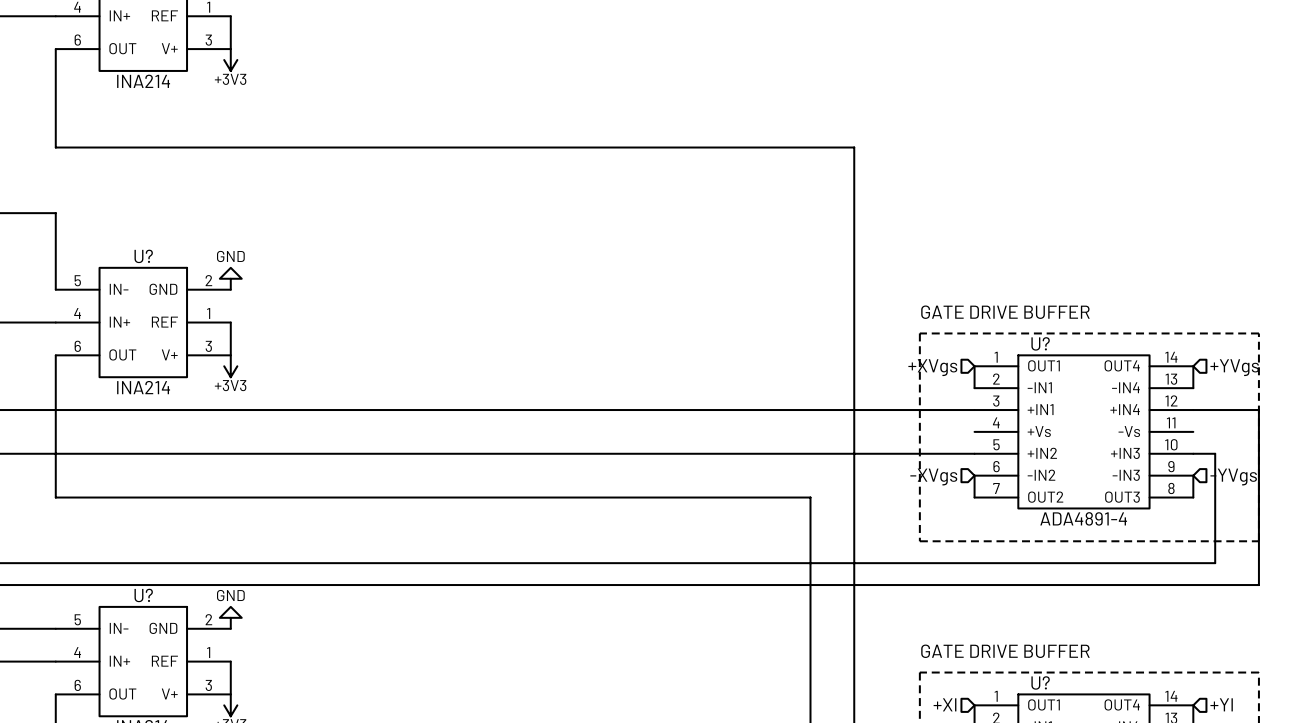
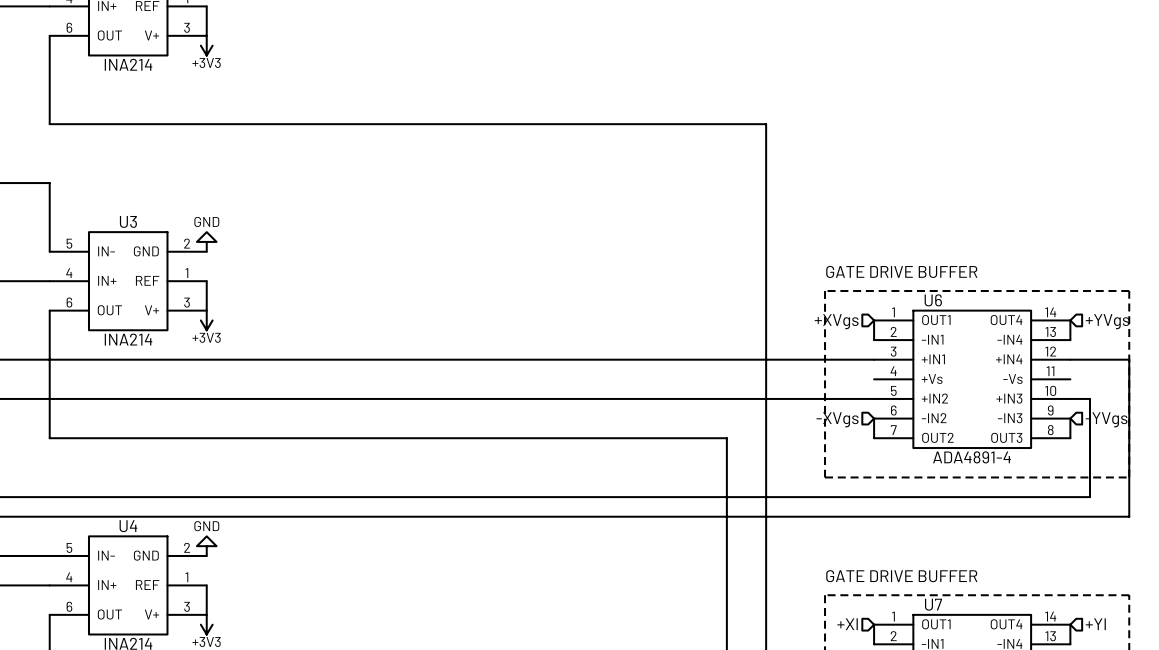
U? name: U? (143, 256) -> U3 (128, 221)
U? name: U? (1040, 343) -> U6 (933, 300)
U? name: U? (143, 595) -> U4 (128, 526)
U? name: U? (1040, 682) -> U7 (933, 604)

